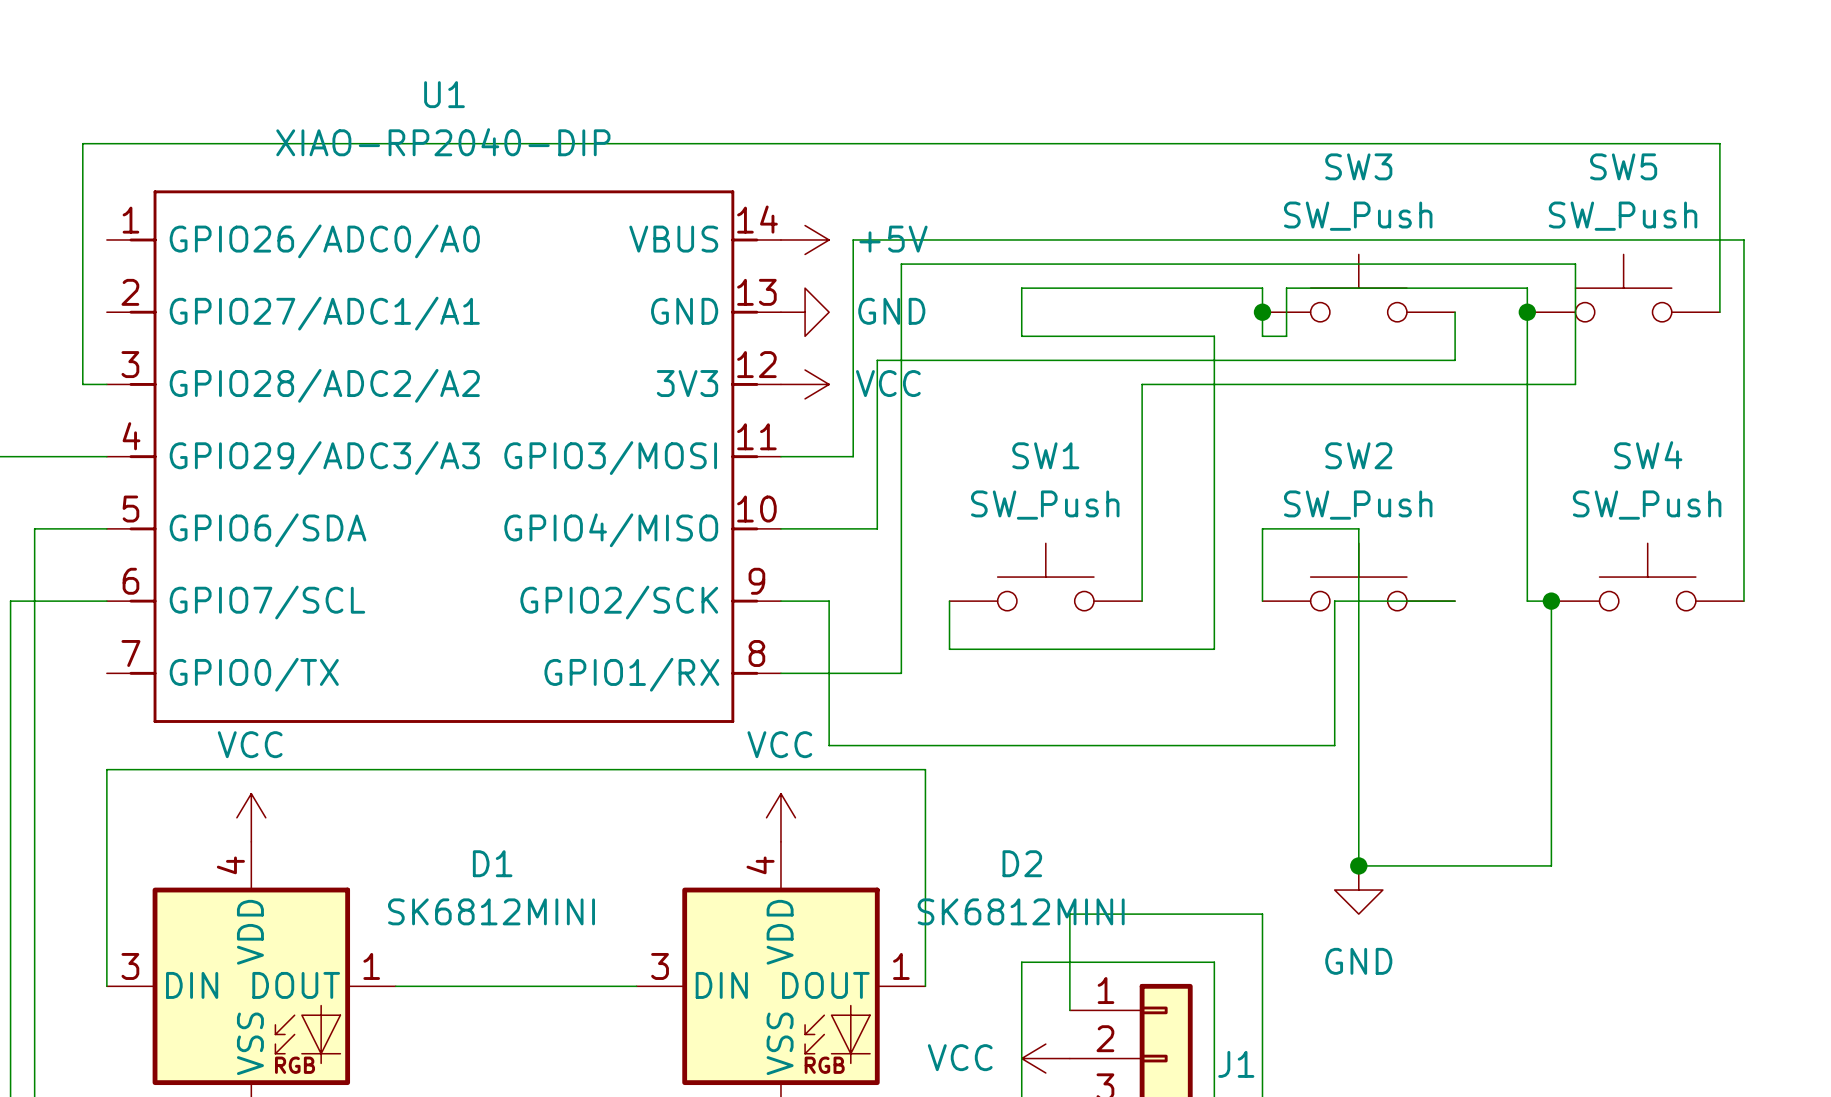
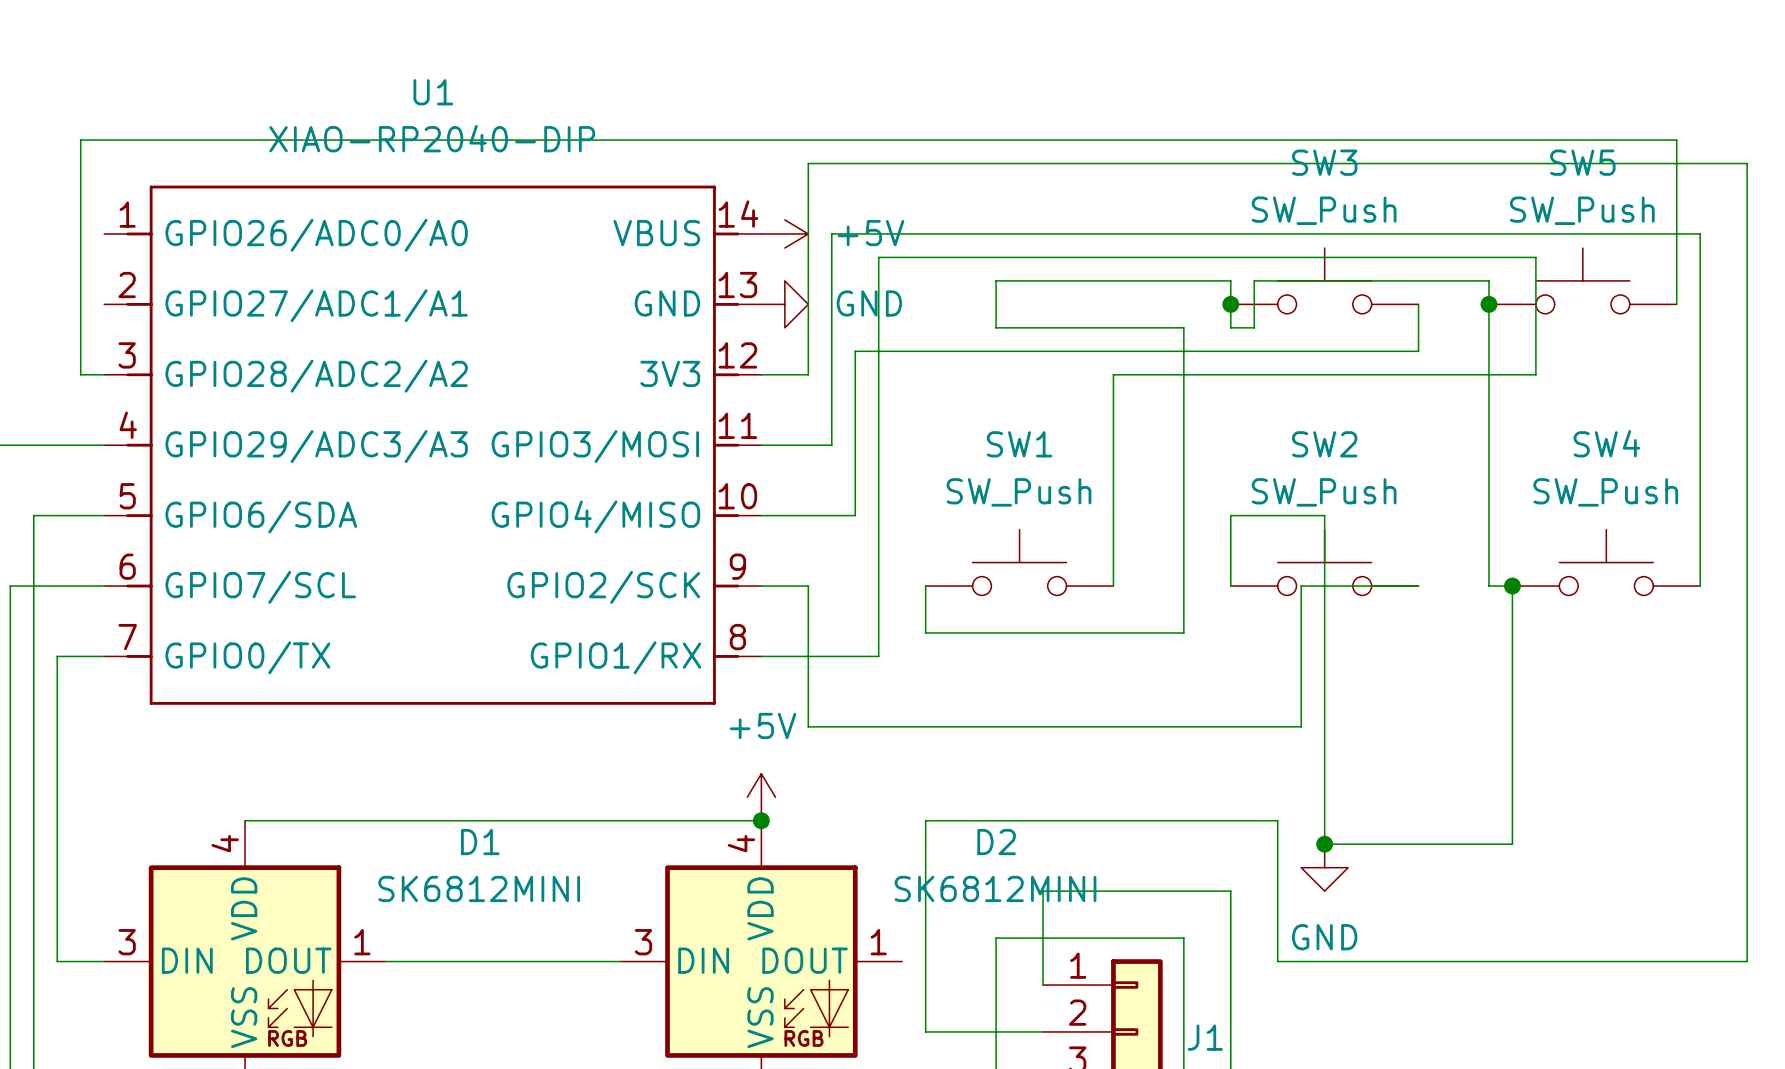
wire: none -> (761, 374) (808, 374) (808, 163) (1747, 163) (1747, 961) (1277, 961) (1277, 820) (925, 820) (925, 1031) (1043, 1031)
power symbol: VCC (805, 384) -> none
power symbol: VCC (251, 817) -> none
power symbol: VCC (780, 817) -> +5V (761, 797)
wire: none -> (245, 820) (761, 820)
junction: none -> (761, 820)
wire: (106, 986) (106, 769) (925, 769) (925, 986) -> (104, 961) (57, 961) (57, 656) (104, 656)
power symbol: VCC (1045, 1058) -> none

